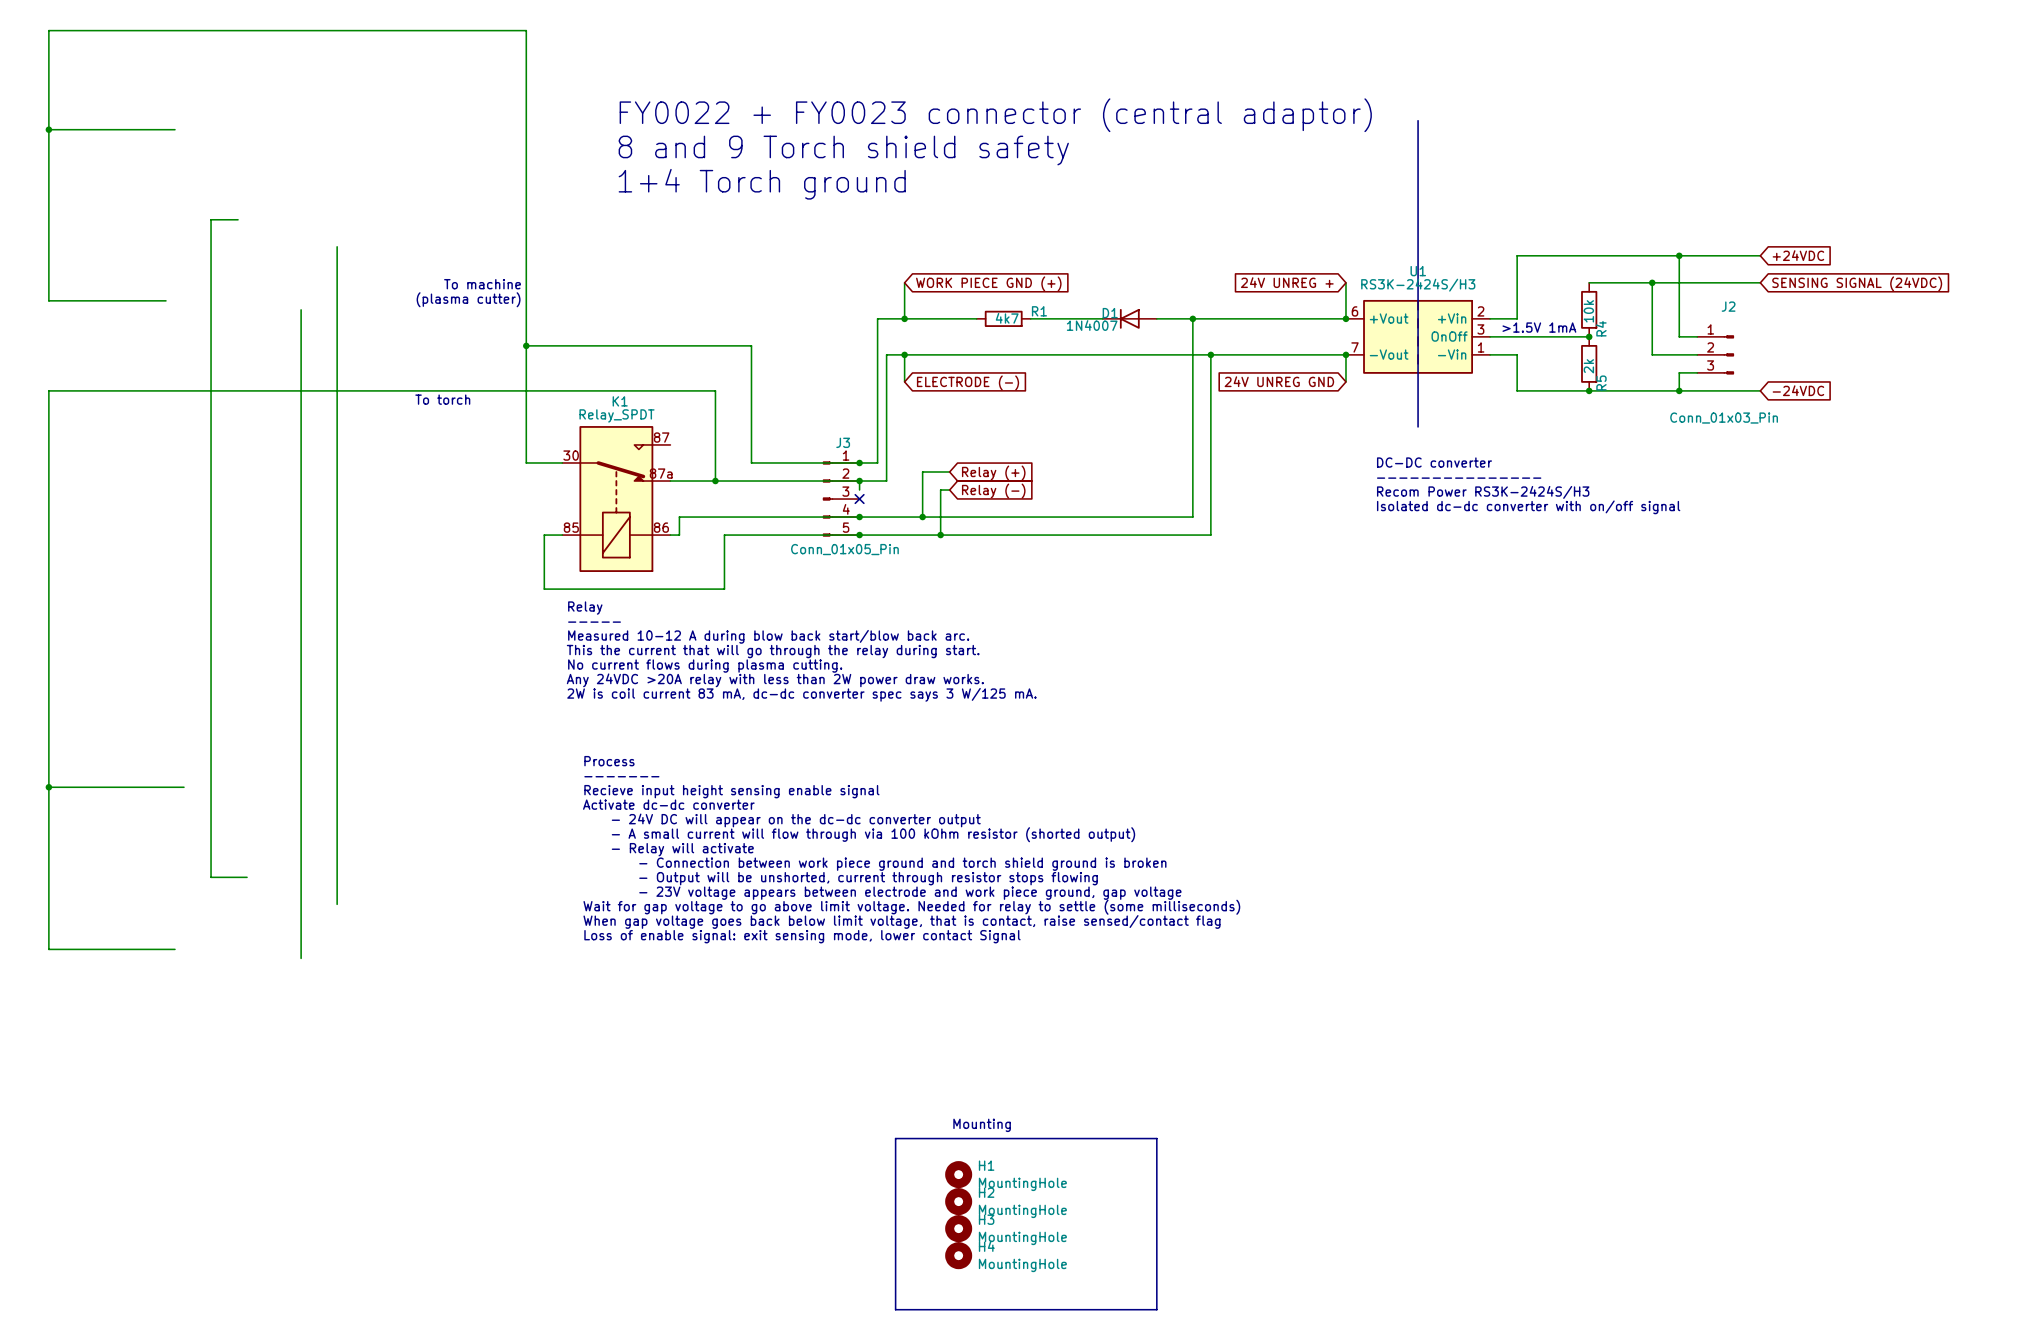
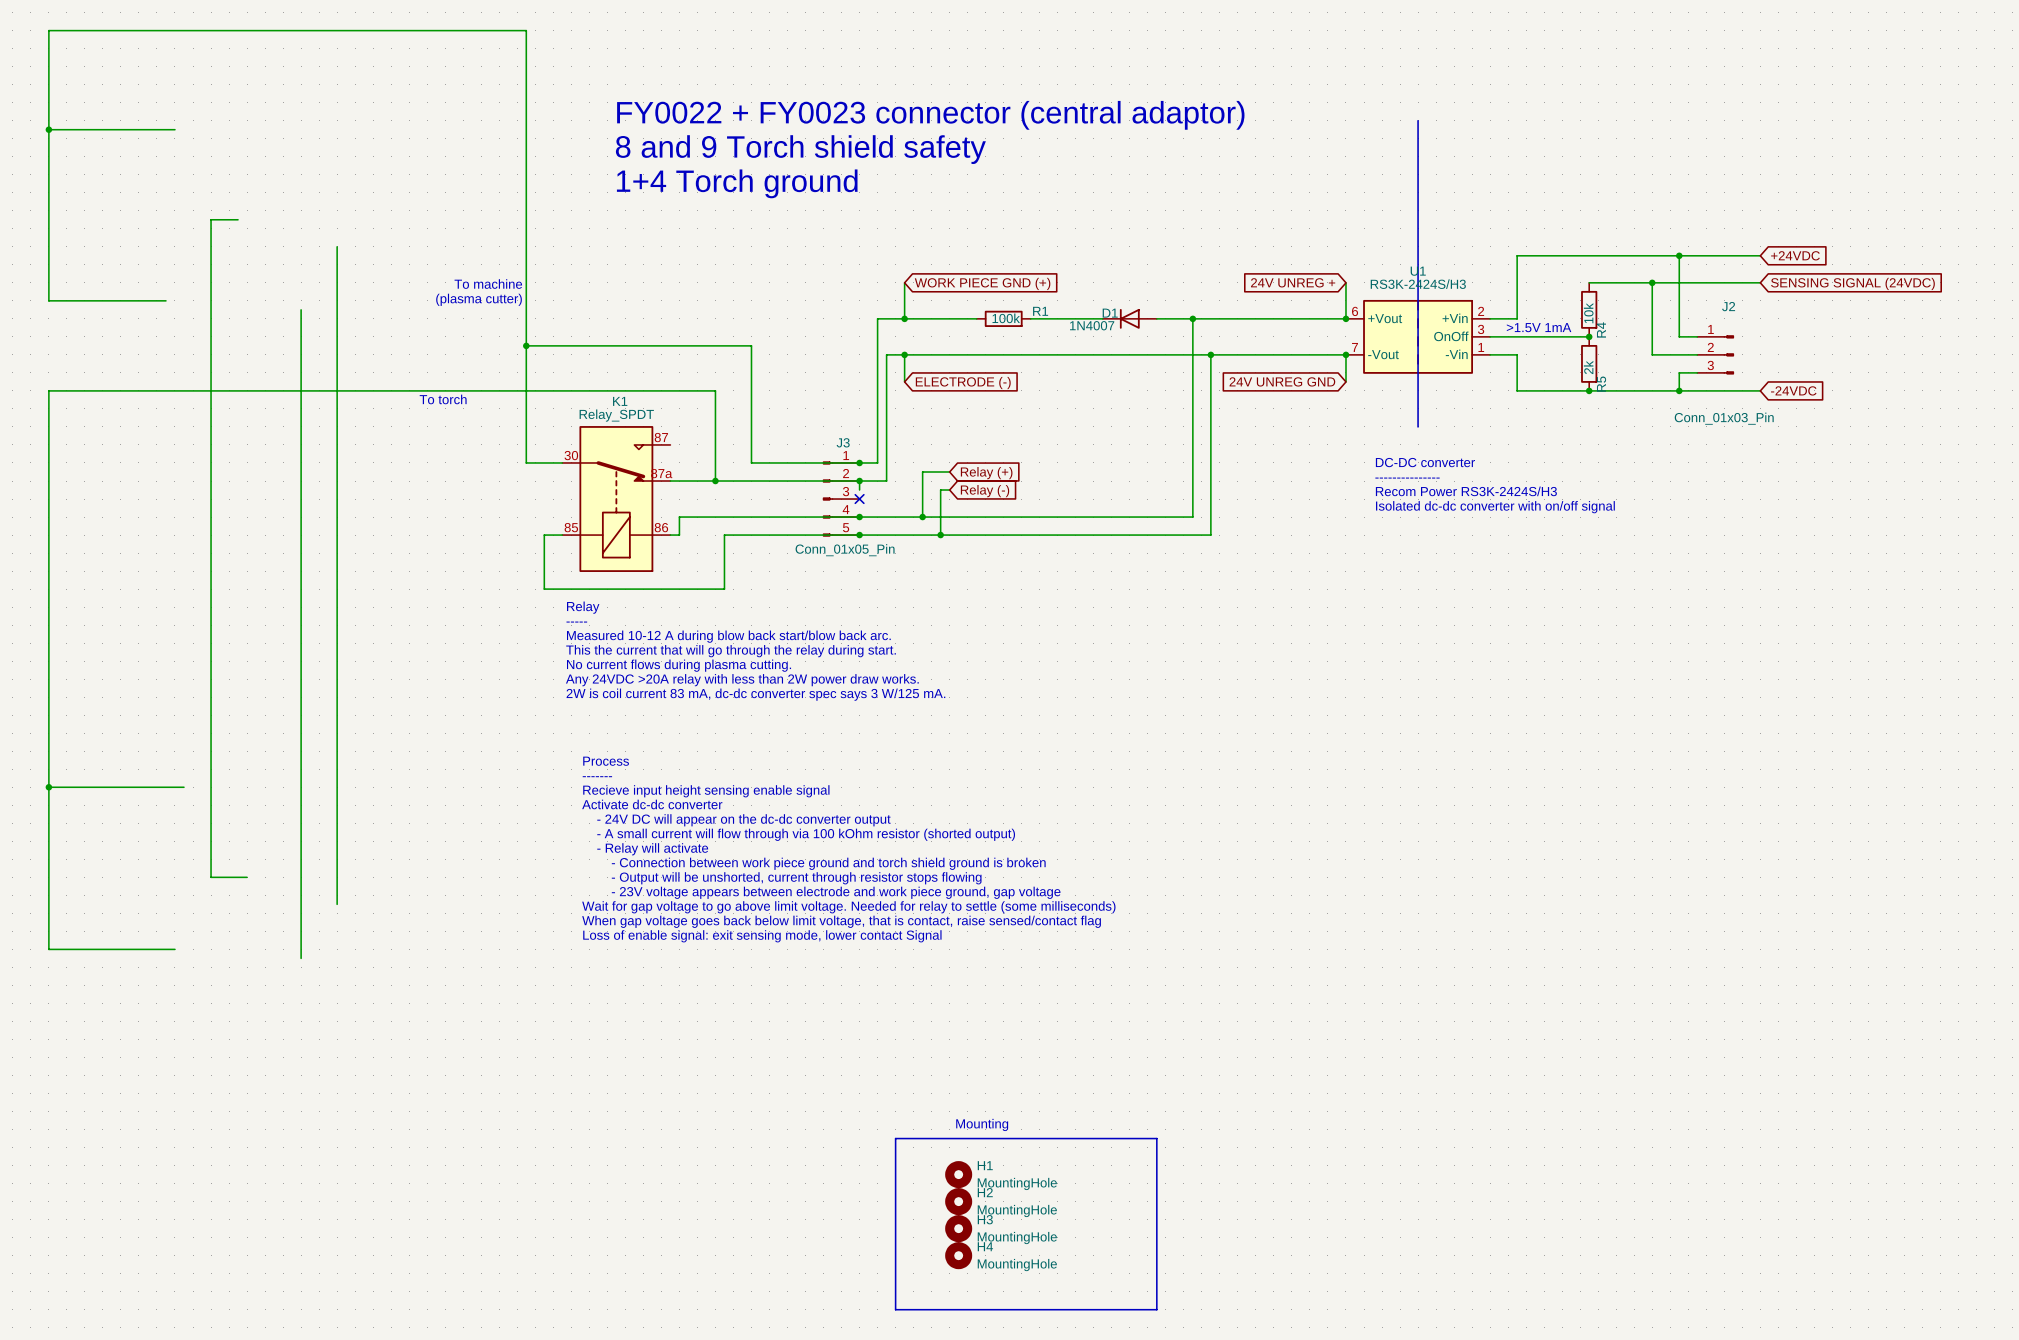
R1 value: 4k7 (1007, 318) -> 100k (1006, 318)

